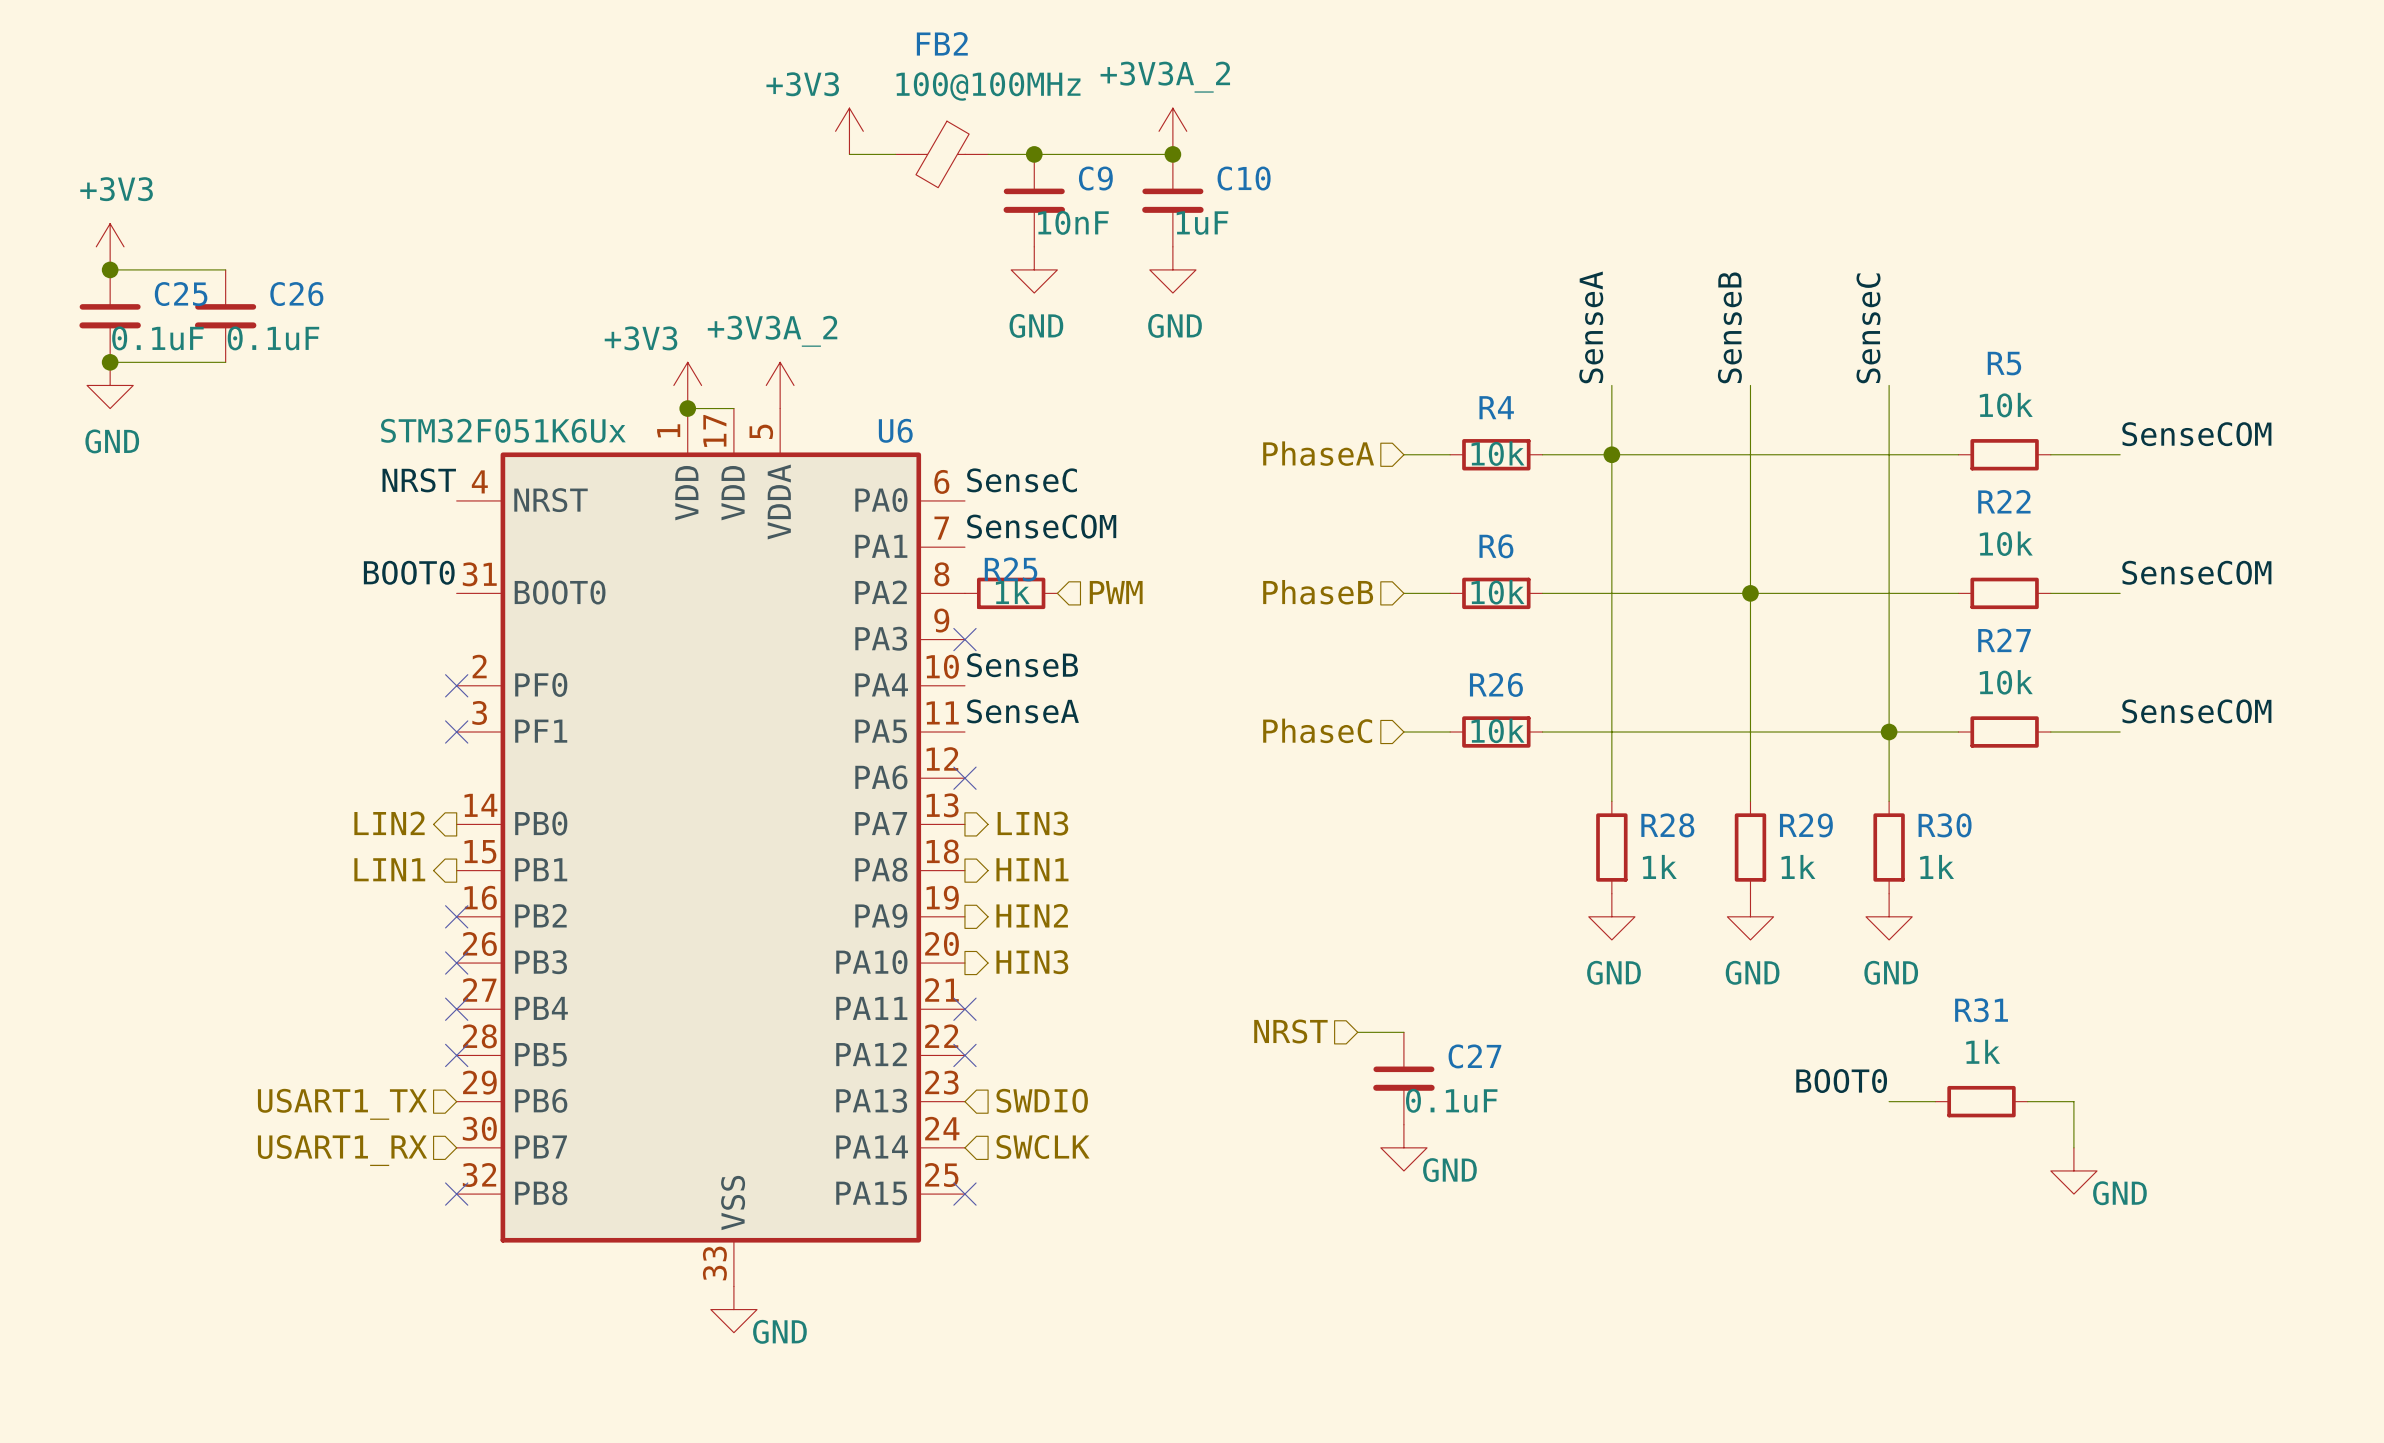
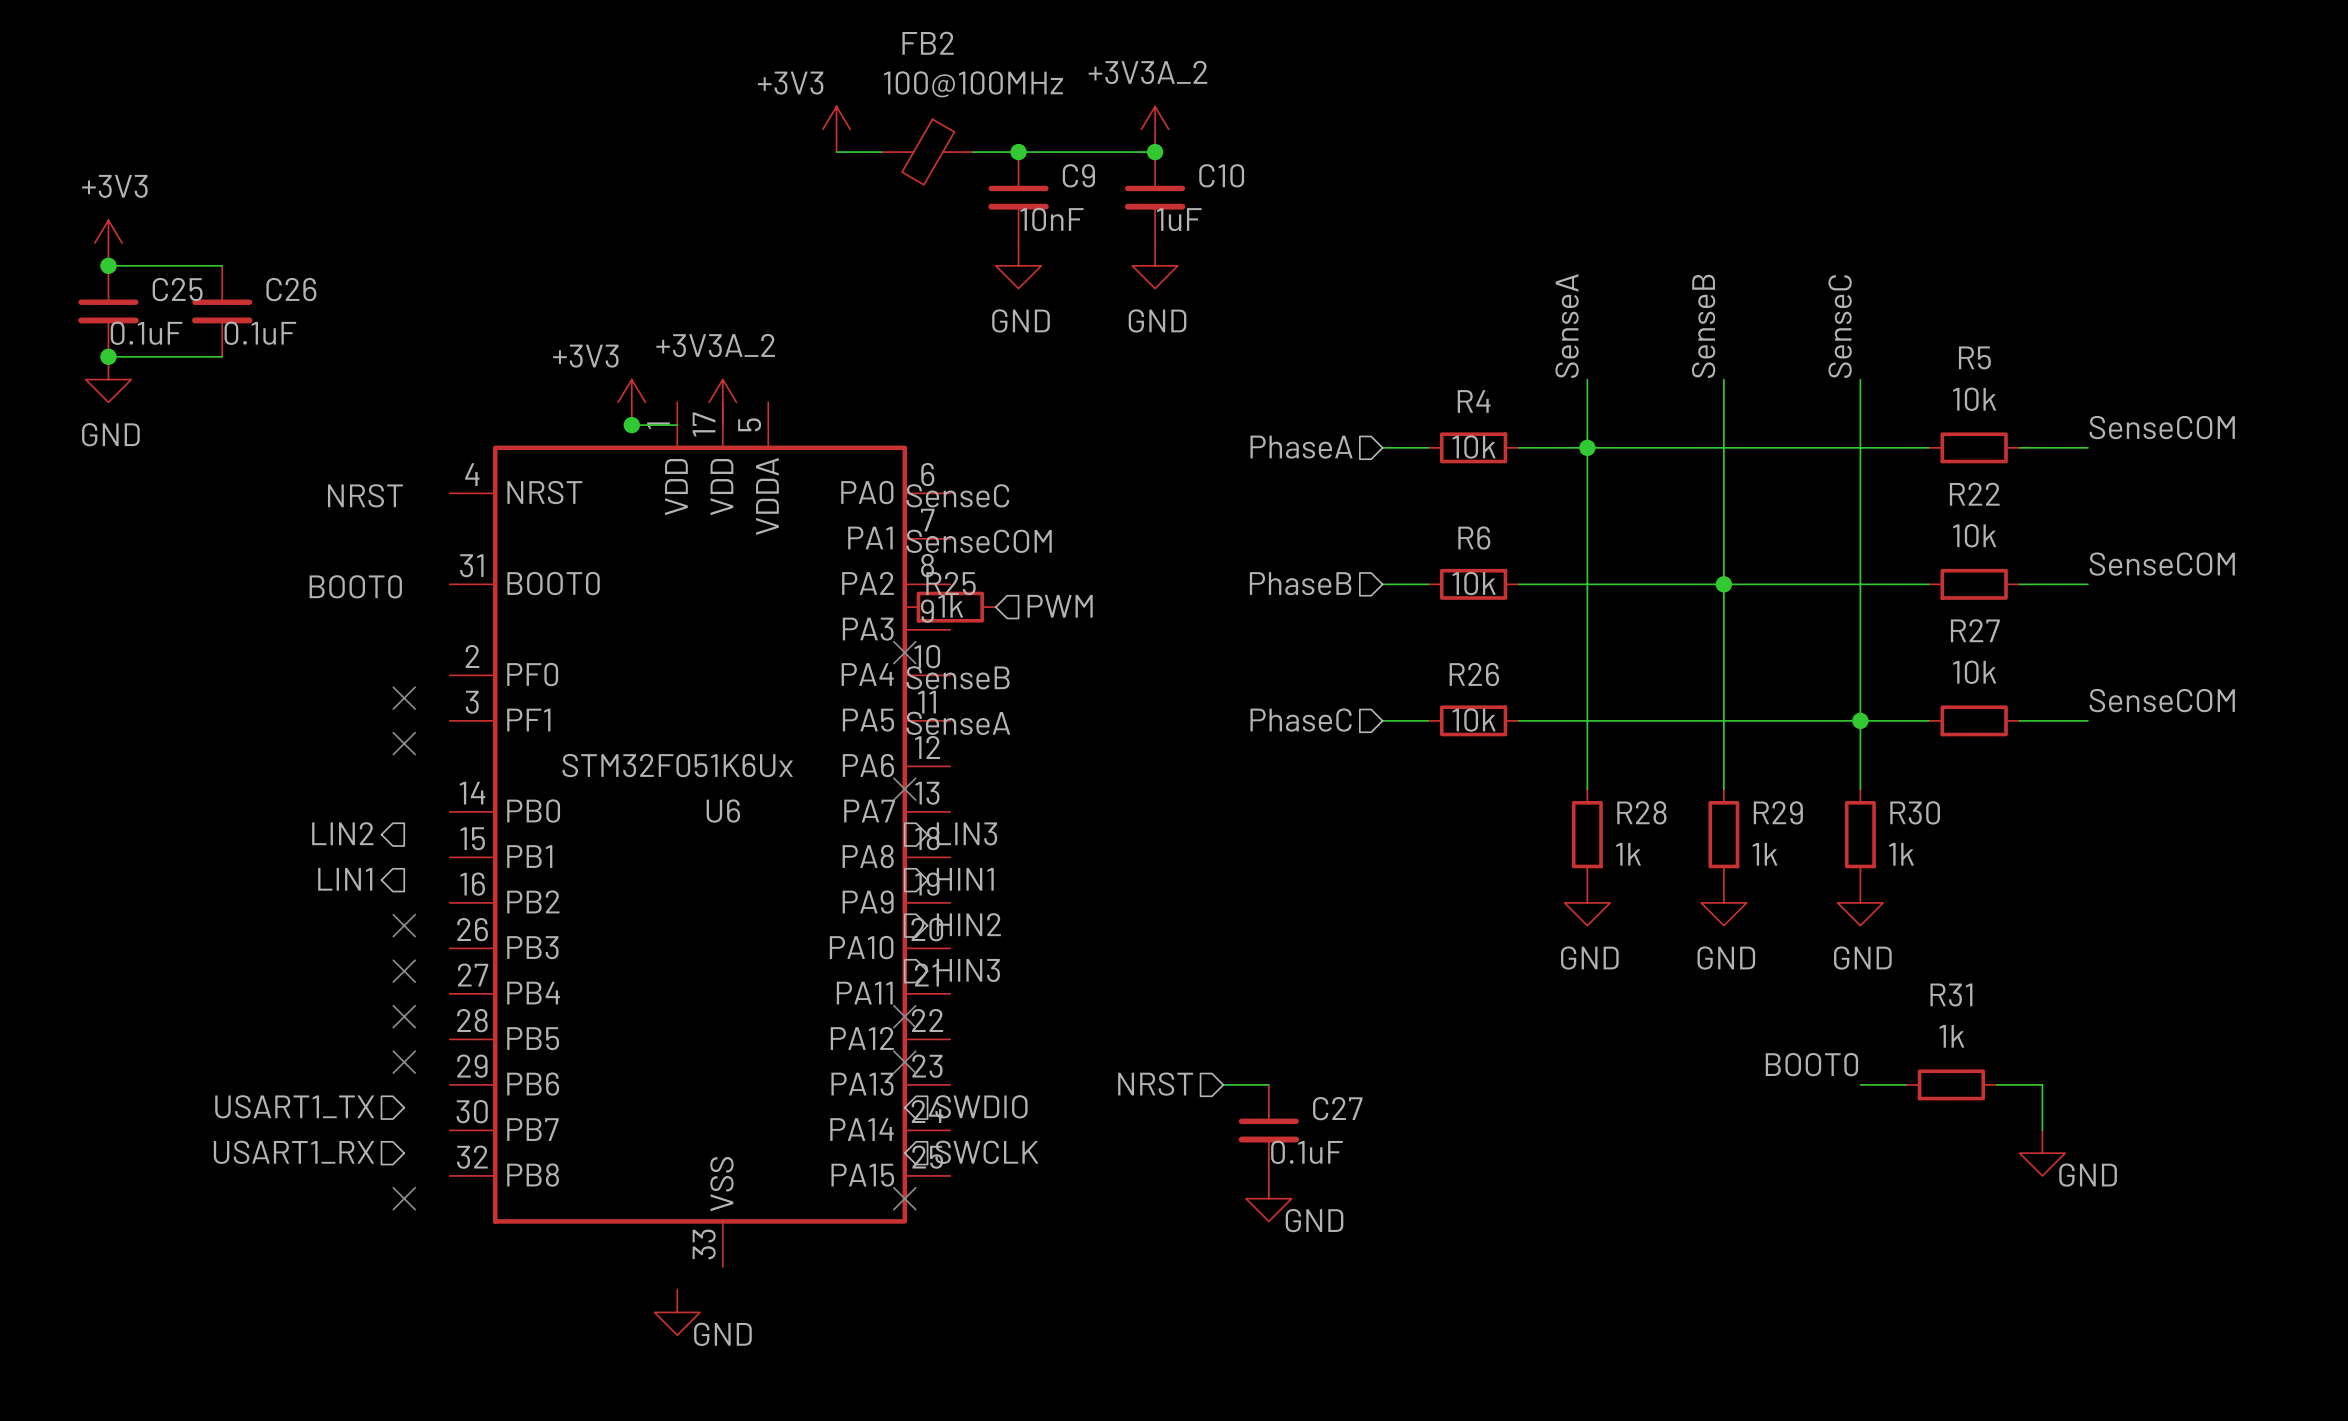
power symbol position: +3V3 (687, 385) -> +3V3 (631, 402)
power symbol position: +3V3A_2 (780, 385) -> +3V3A_2 (722, 402)
wire: (687, 408) (733, 408) -> (631, 425) (677, 425)
junction position: (687, 408) -> (631, 425)
U6 value position: STM32F051K6Ux (503, 430) -> STM32F051K6Ux (677, 765)
U6 name position: U6 (895, 430) -> U6 (723, 811)
label position: NRST (419, 480) -> NRST (365, 495)
label position: SenseC (1022, 480) -> SenseC (957, 495)
label position: SenseCOM (1041, 526) -> SenseCOM (979, 541)
label position: BOOT0 (409, 572) -> BOOT0 (355, 586)
hierarchical label position: PWM (1116, 592) -> PWM (1060, 606)
R25 position: (1011, 593) -> (950, 607)
no-connect mark position: (964, 639) -> (904, 652)
label position: SenseB (1022, 665) -> SenseB (958, 677)
no-connect mark: (456, 685) -> none
no-connect mark: none -> (404, 698)
label position: SenseA (1022, 711) -> SenseA (958, 723)
no-connect mark: (456, 732) -> none
no-connect mark: none -> (404, 743)
no-connect mark position: (964, 778) -> (904, 789)
hierarchical label position: LIN2 (389, 823) -> LIN2 (342, 833)
hierarchical label position: LIN3 (1032, 823) -> LIN3 (966, 833)
hierarchical label position: LIN1 (389, 869) -> LIN1 (345, 879)
hierarchical label position: HIN1 (1032, 869) -> HIN1 (965, 879)
hierarchical label position: HIN2 (1032, 915) -> HIN2 (968, 924)
no-connect mark: (456, 916) -> none
no-connect mark: none -> (404, 925)
hierarchical label position: HIN3 (1032, 962) -> HIN3 (968, 970)
no-connect mark: (456, 963) -> none
no-connect mark: none -> (404, 971)
no-connect mark: (456, 1009) -> none
no-connect mark: (964, 1009) -> none
hierarchical label position: NRST (1290, 1031) -> NRST (1155, 1084)
no-connect mark: none -> (404, 1016)
no-connect mark: none -> (904, 1016)
wire: (1357, 1032) (1403, 1032) -> (1223, 1084) (1268, 1084)
no-connect mark: (456, 1055) -> none
no-connect mark: (964, 1055) -> none
no-connect mark: none -> (404, 1062)
no-connect mark: none -> (904, 1062)
C27 position: (1403, 1078) -> (1268, 1130)
hierarchical label position: SWDIO (1042, 1100) -> SWDIO (981, 1106)
hierarchical label position: USART1_TX (342, 1104) -> USART1_TX (294, 1106)
hierarchical label position: SWCLK (1043, 1147) -> SWCLK (986, 1152)
power symbol position: GND (1403, 1147) -> GND (1268, 1198)
hierarchical label position: USART1_RX (342, 1150) -> USART1_RX (293, 1152)
no-connect mark position: (456, 1194) -> (404, 1198)
no-connect mark position: (964, 1194) -> (904, 1198)
power symbol position: GND (733, 1309) -> GND (677, 1312)

